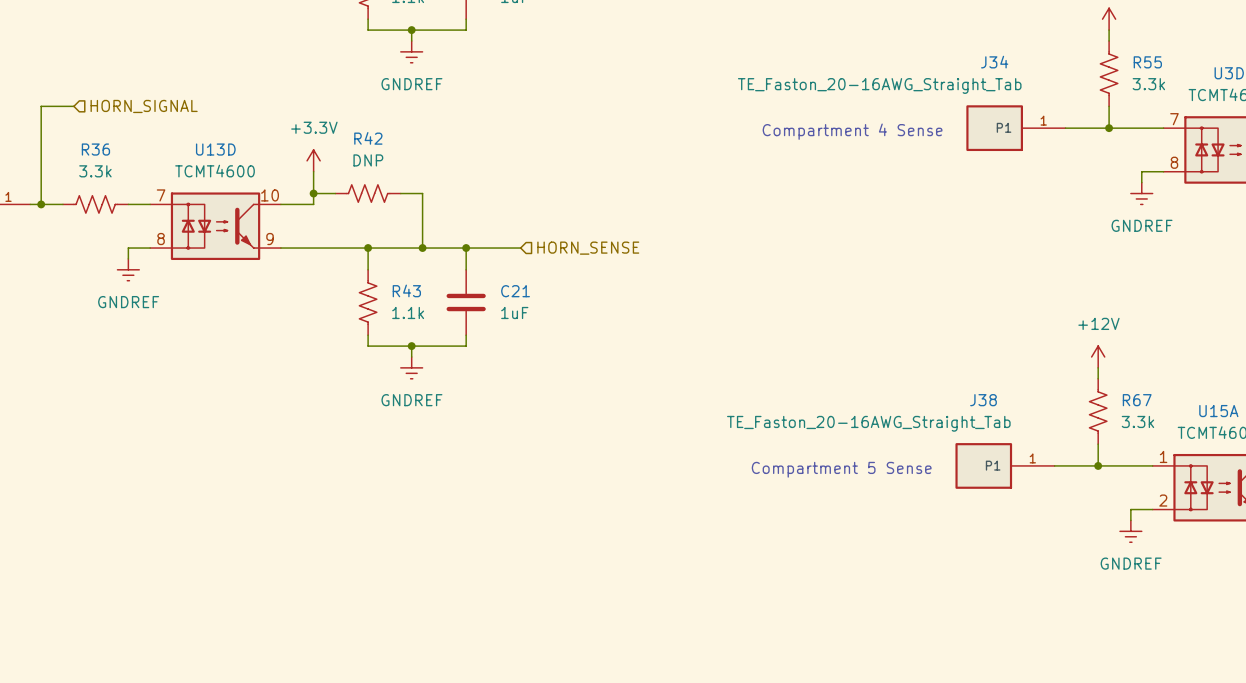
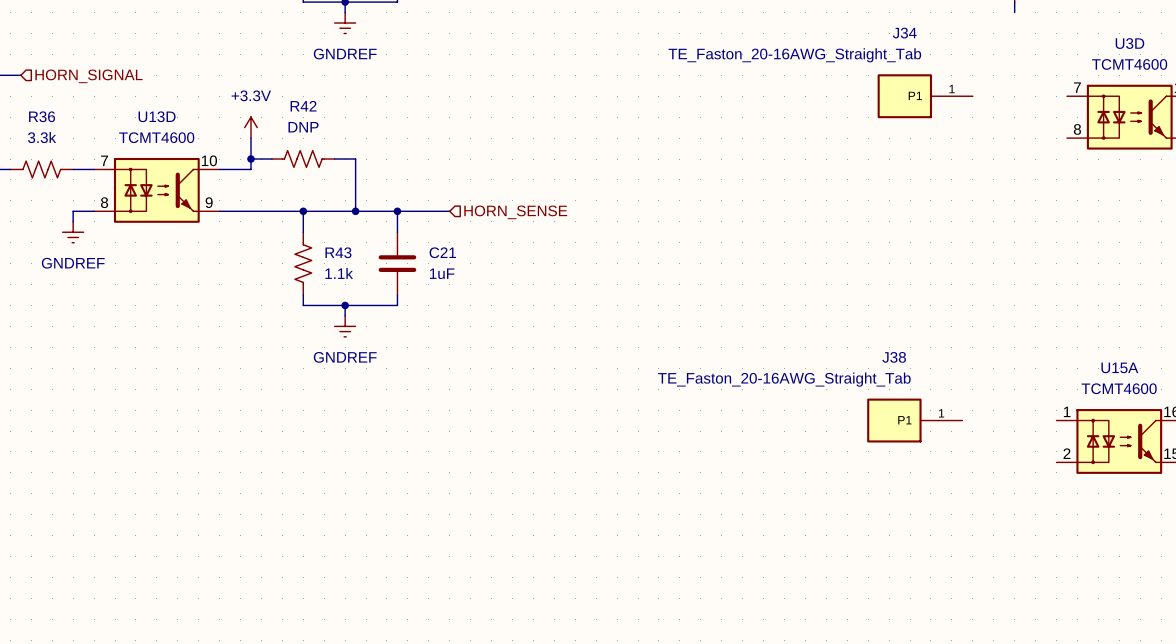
R55: 3.3k (1109, 73) -> none
wire: (1109, 106) (1109, 128) -> none
wire: (1065, 128) (1163, 128) -> none
junction: (1109, 128) -> none
text: Compartment 4 Sense (852, 131) -> none
wire: (1163, 171) (1141, 171) (1141, 182) -> none
power symbol: GNDREF (1141, 193) -> none
power symbol: +12V (1098, 356) -> none
wire: (1098, 367) (1098, 378) -> none
R67: 3.3k (1098, 411) -> none
wire: (1098, 444) (1098, 465) -> none
wire: (1054, 465) (1152, 465) -> none
junction: (1098, 465) -> none
text: Compartment 5 Sense (841, 469) -> none
wire: (1152, 509) (1130, 509) (1130, 520) -> none
power symbol: GNDREF (1130, 531) -> none

